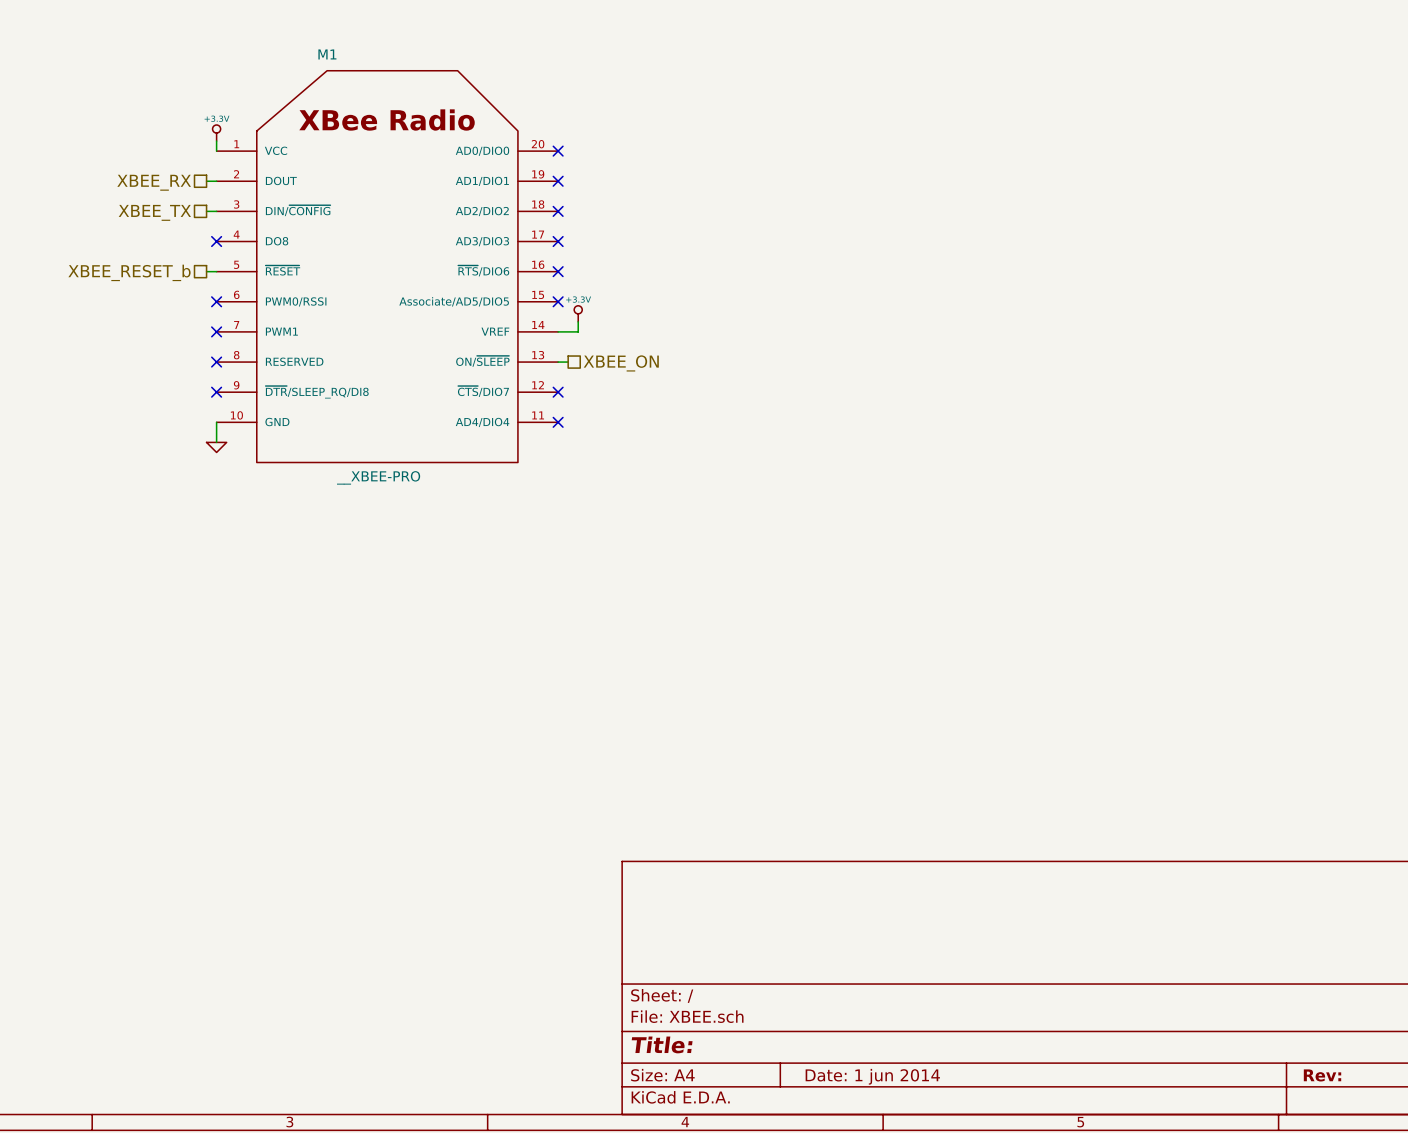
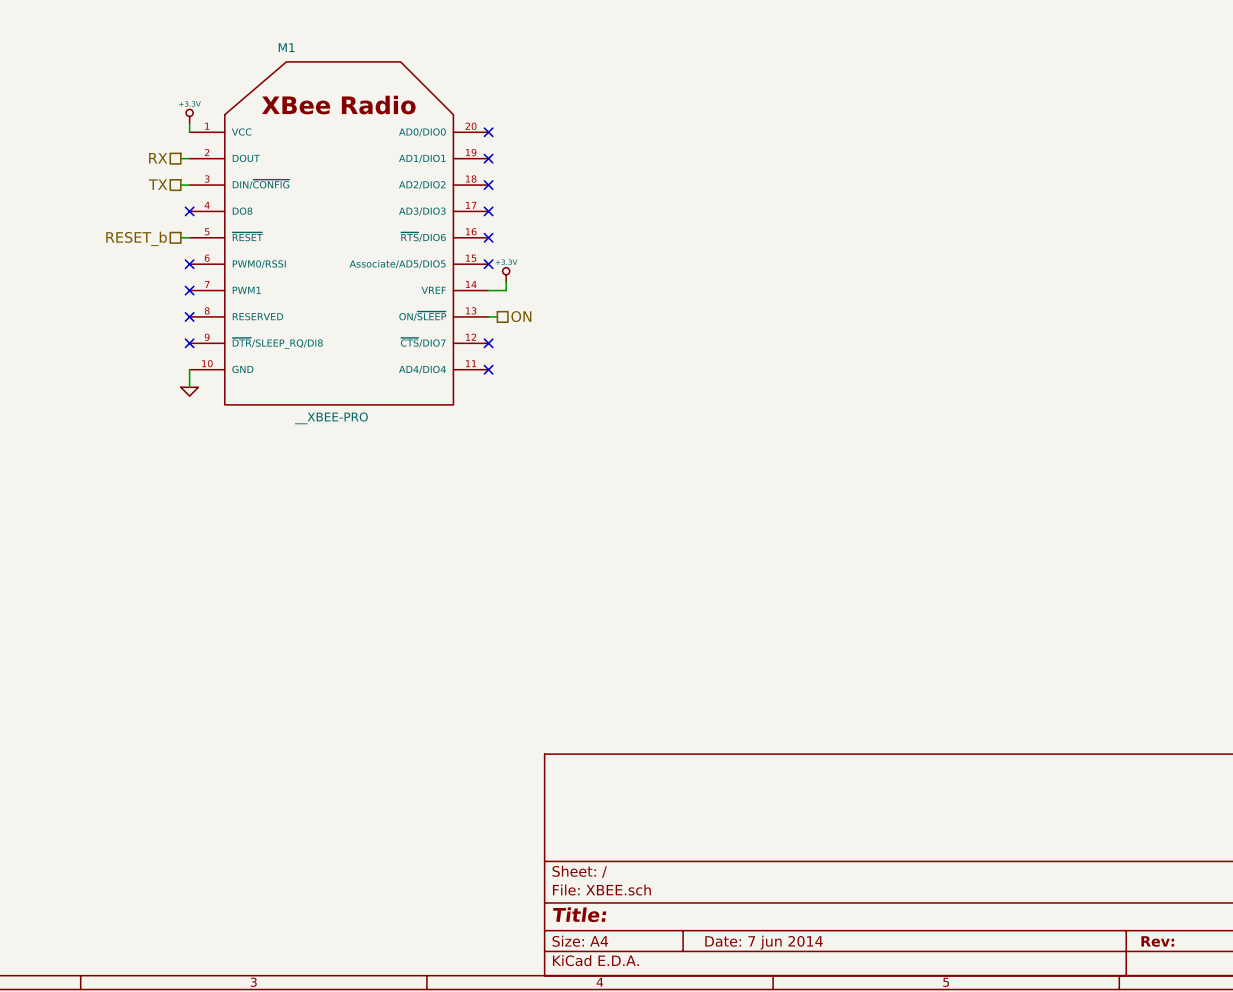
hierarchical label: XBEE_RX (154, 182) -> RX (158, 158)
hierarchical label: XBEE_TX (154, 212) -> TX (158, 184)
hierarchical label: XBEE_RESET_b (129, 272) -> RESET_b (136, 238)
hierarchical label: XBEE_ON (621, 363) -> ON (521, 316)
title block: Date: 1 jun 2014 (872, 1076) -> Date: 7 jun 2014 (764, 942)

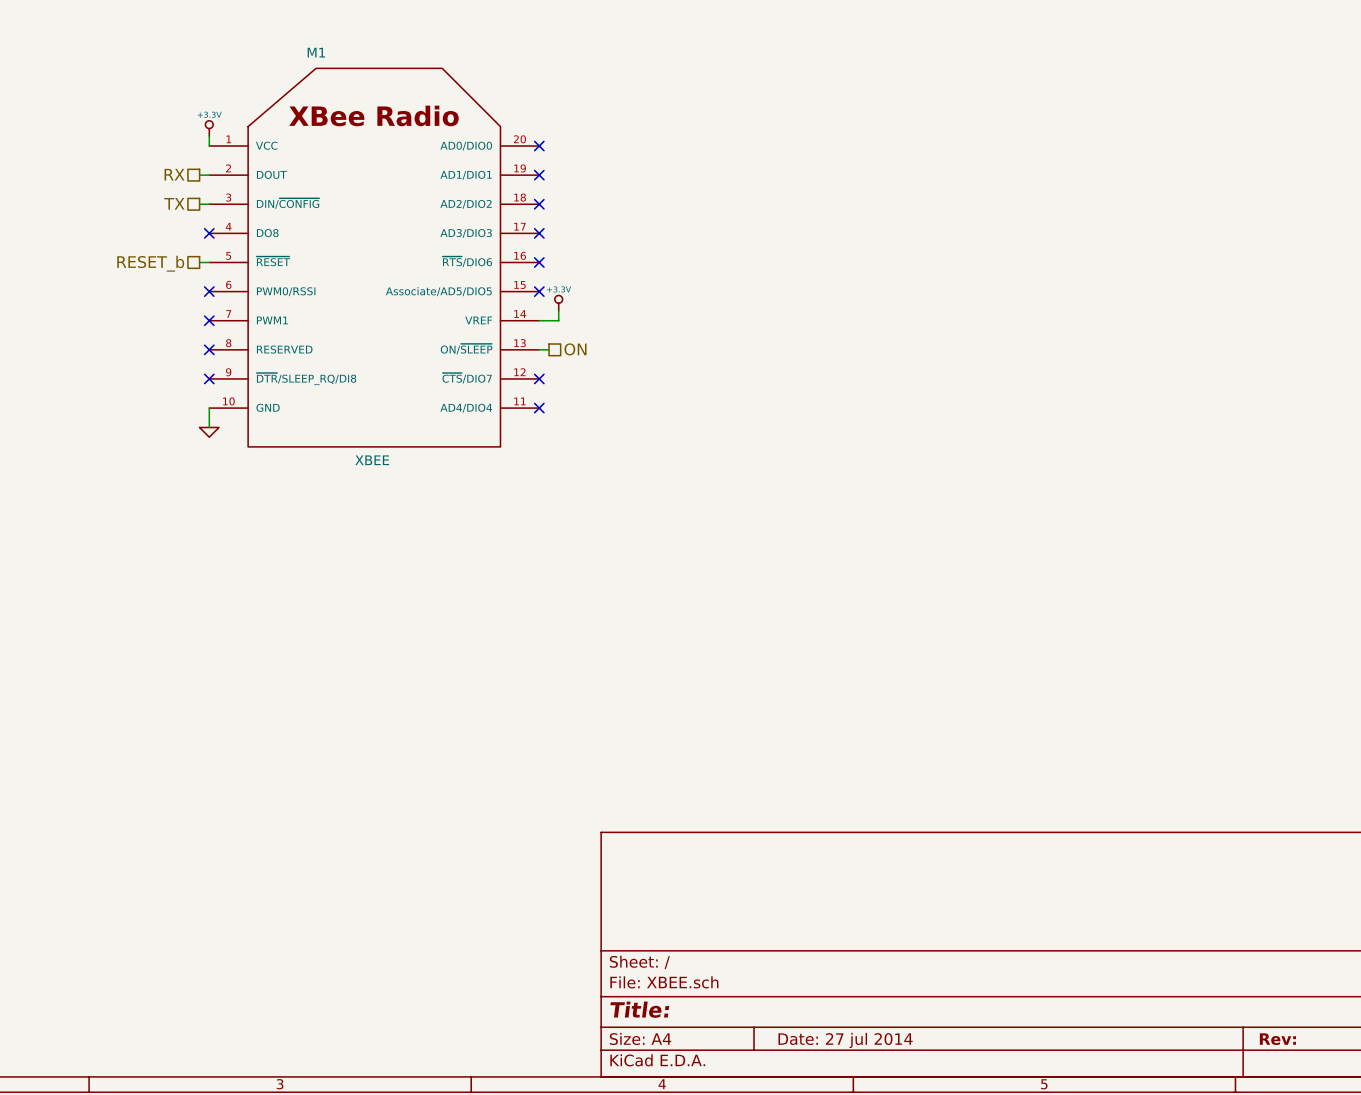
M1 value: __XBEE-PRO (331, 418) -> XBEE (372, 460)
title block: Date: 7 jun 2014 (764, 942) -> Date: 27 jul 2014 (845, 1040)

